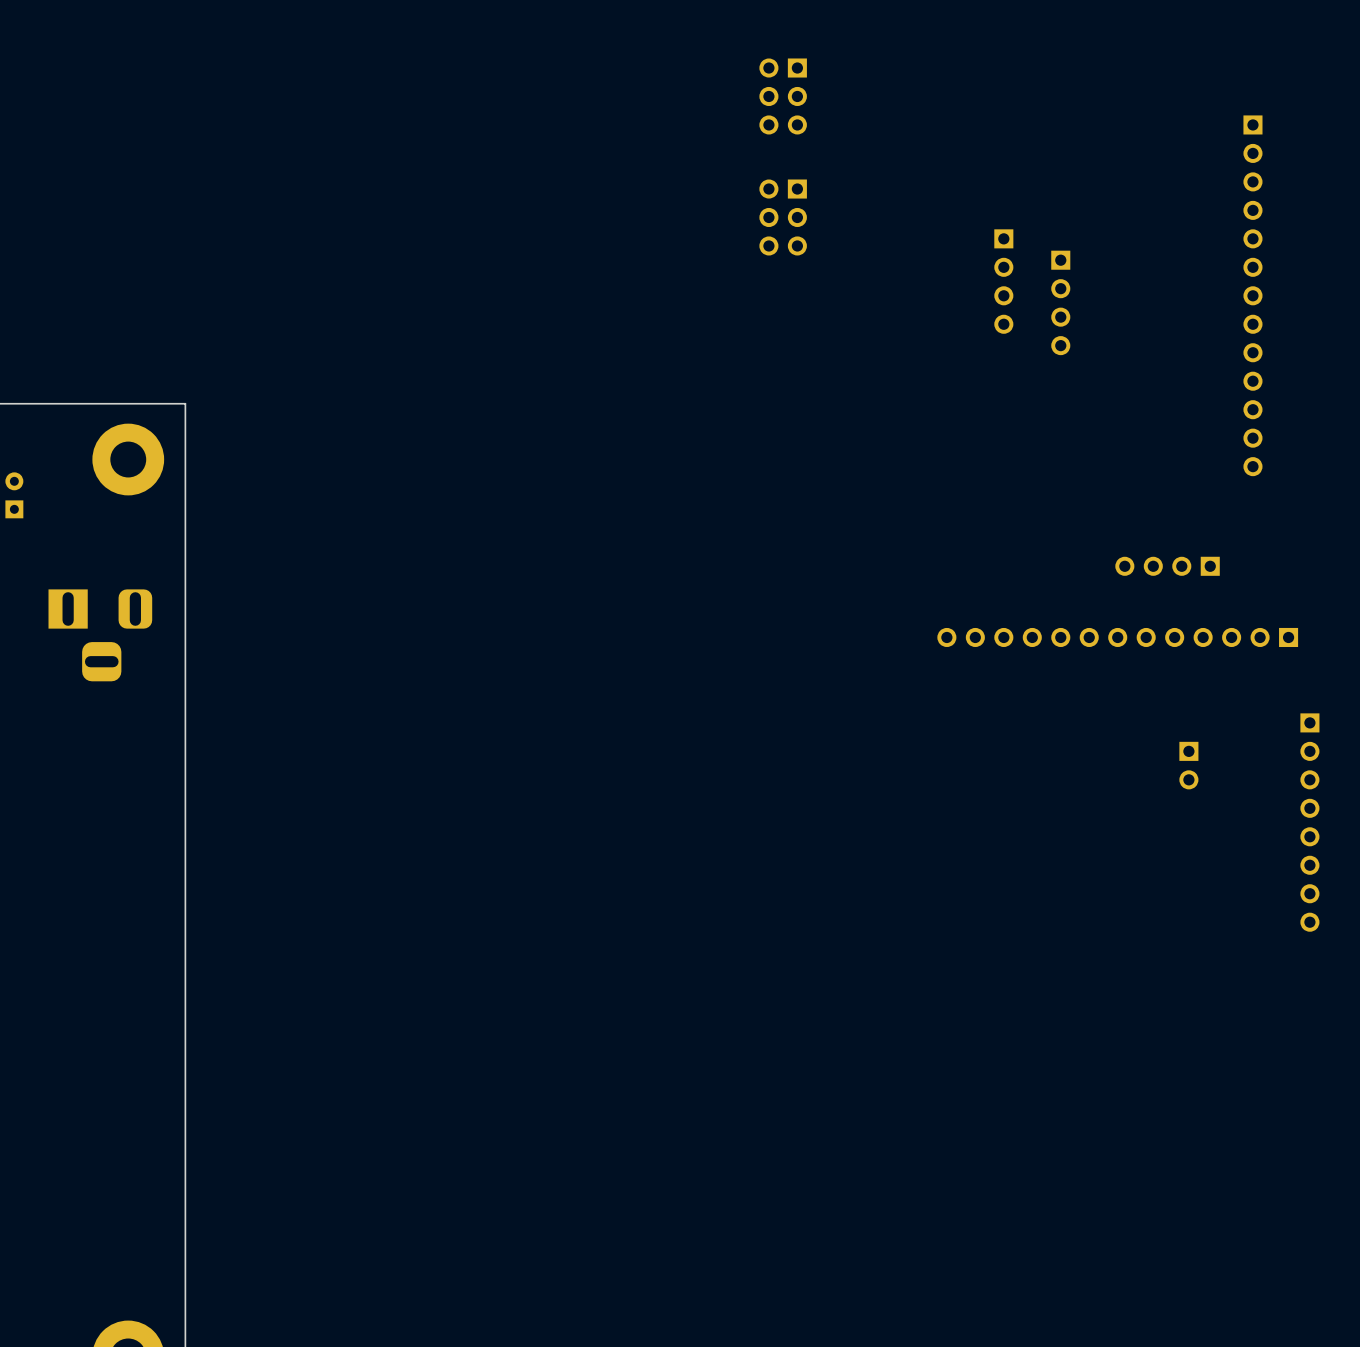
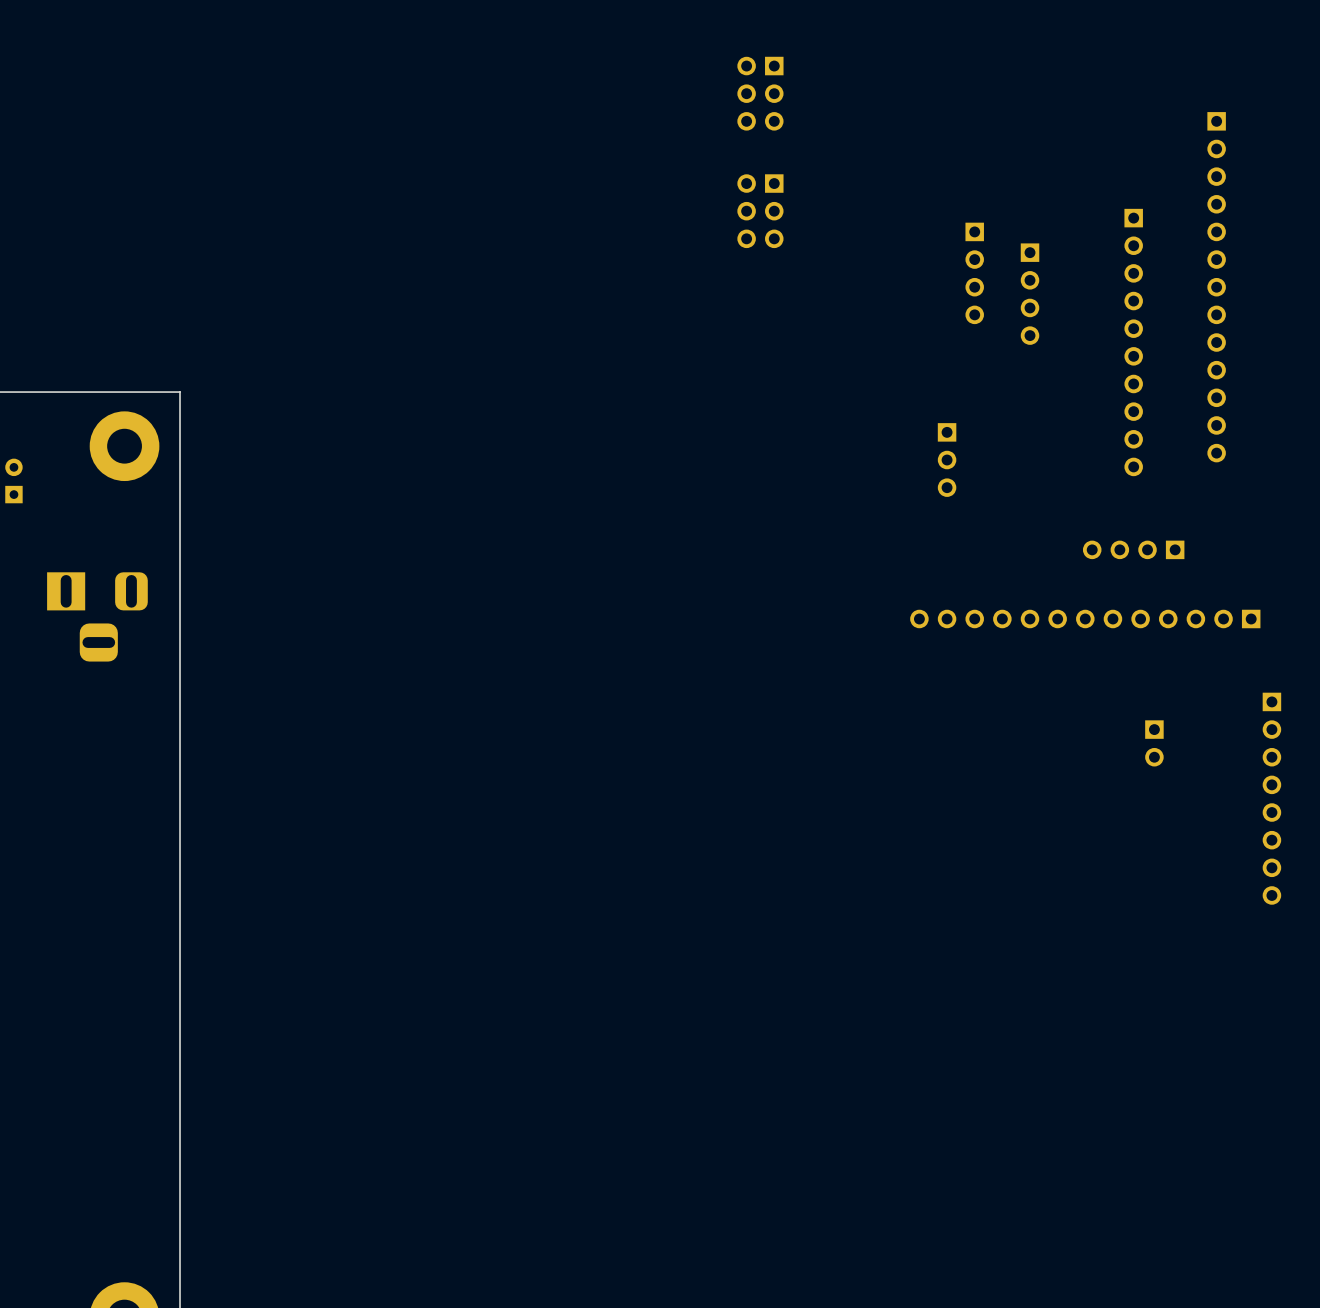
part: none -> (1133, 342)
part: none -> (947, 460)

